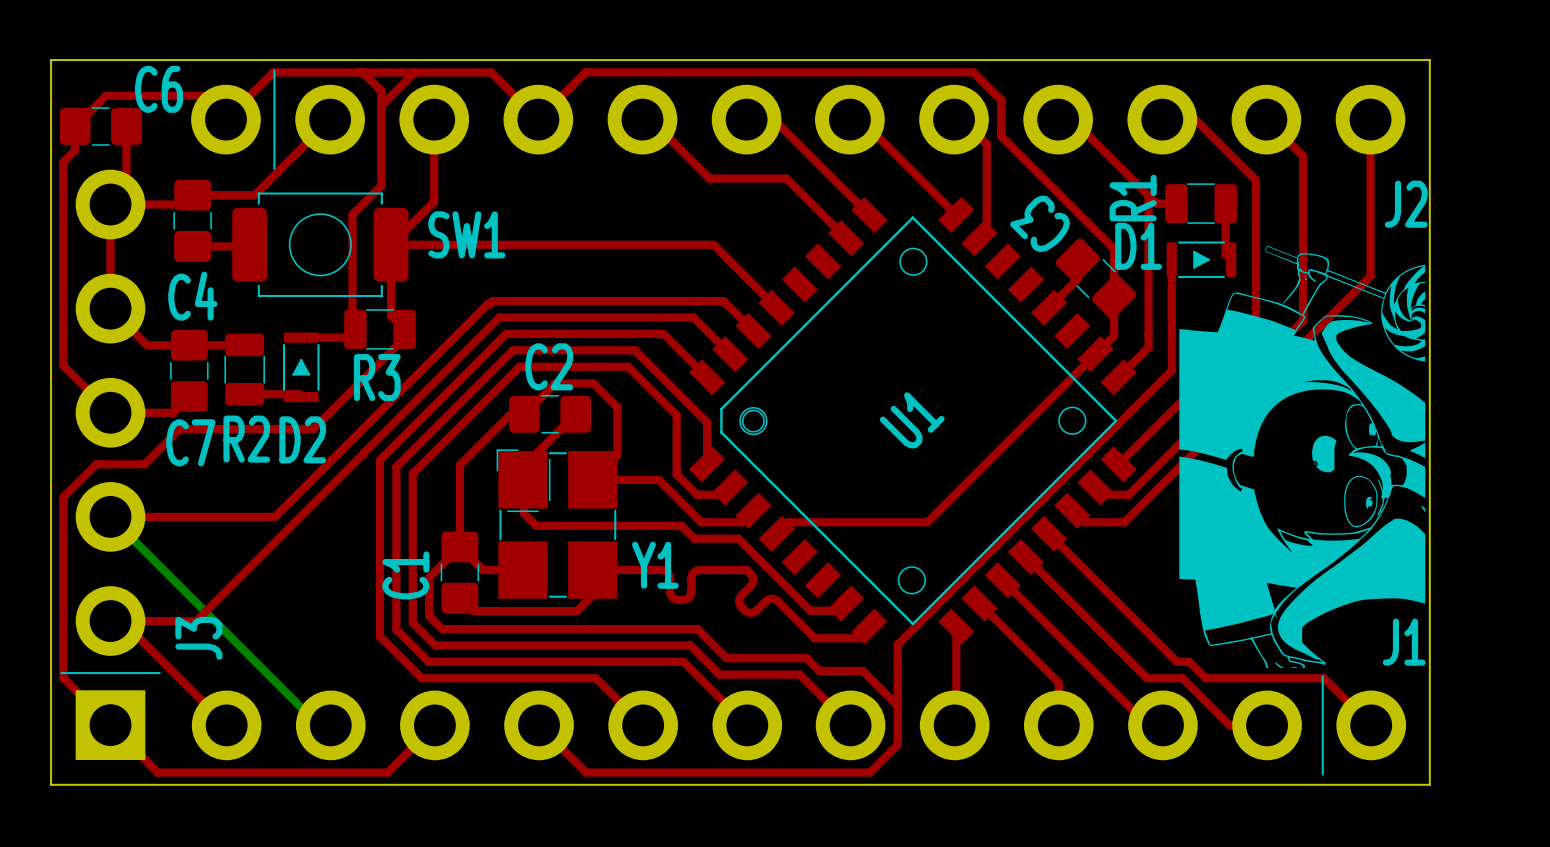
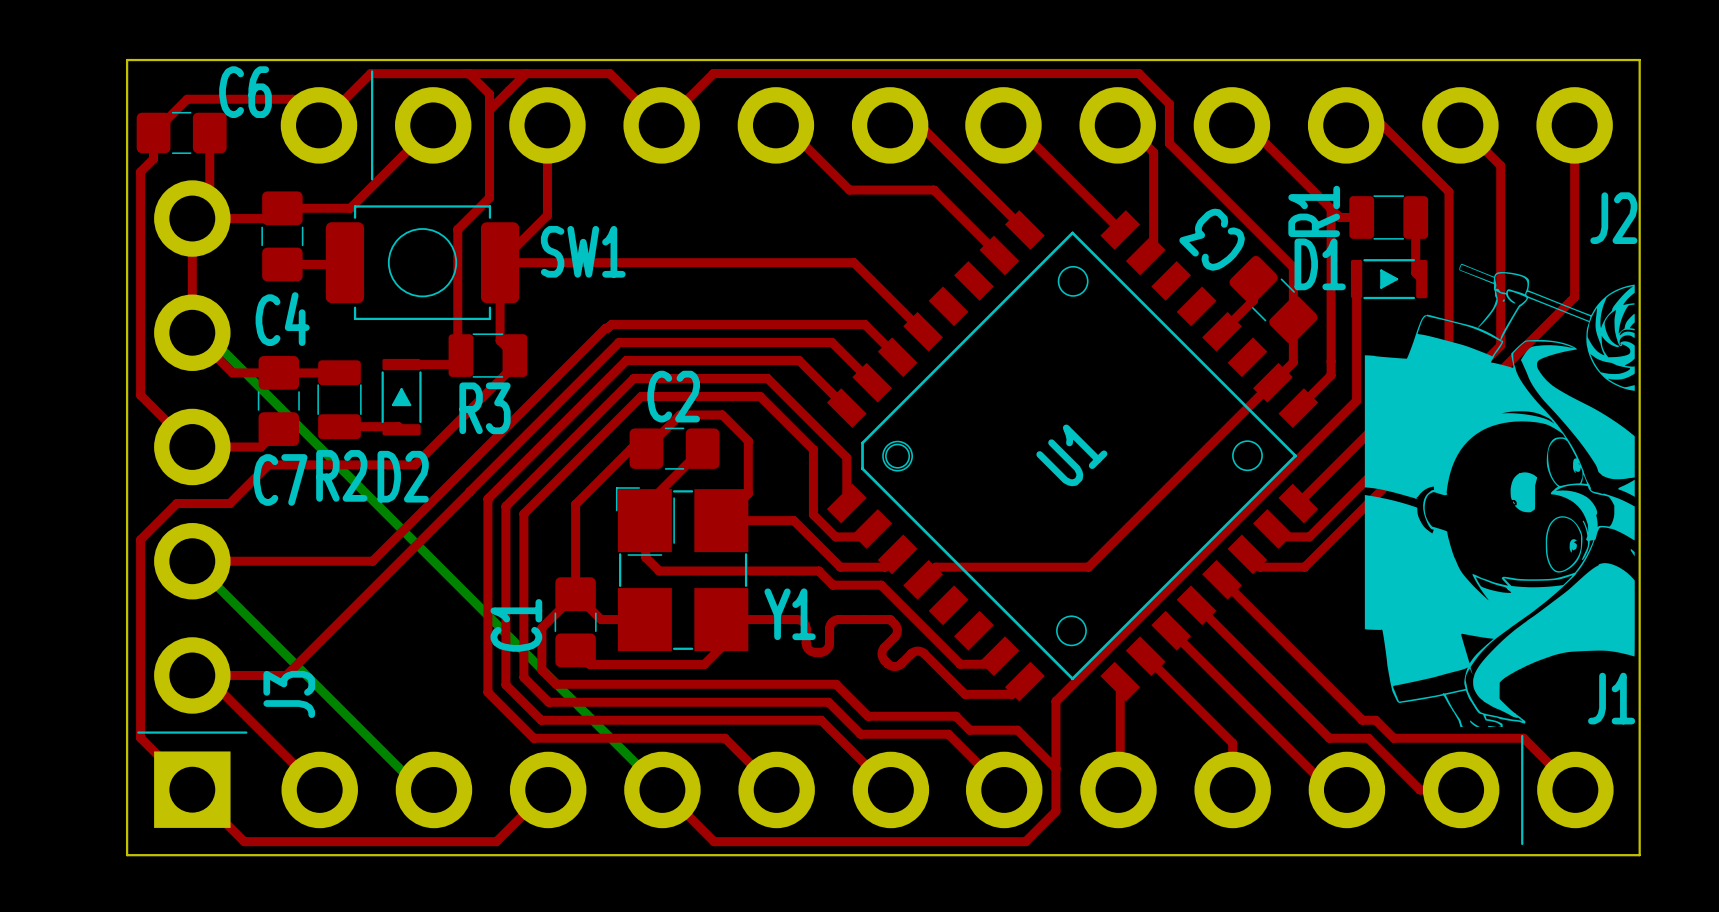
bottom track: none -> (205, 332) (662, 789)

